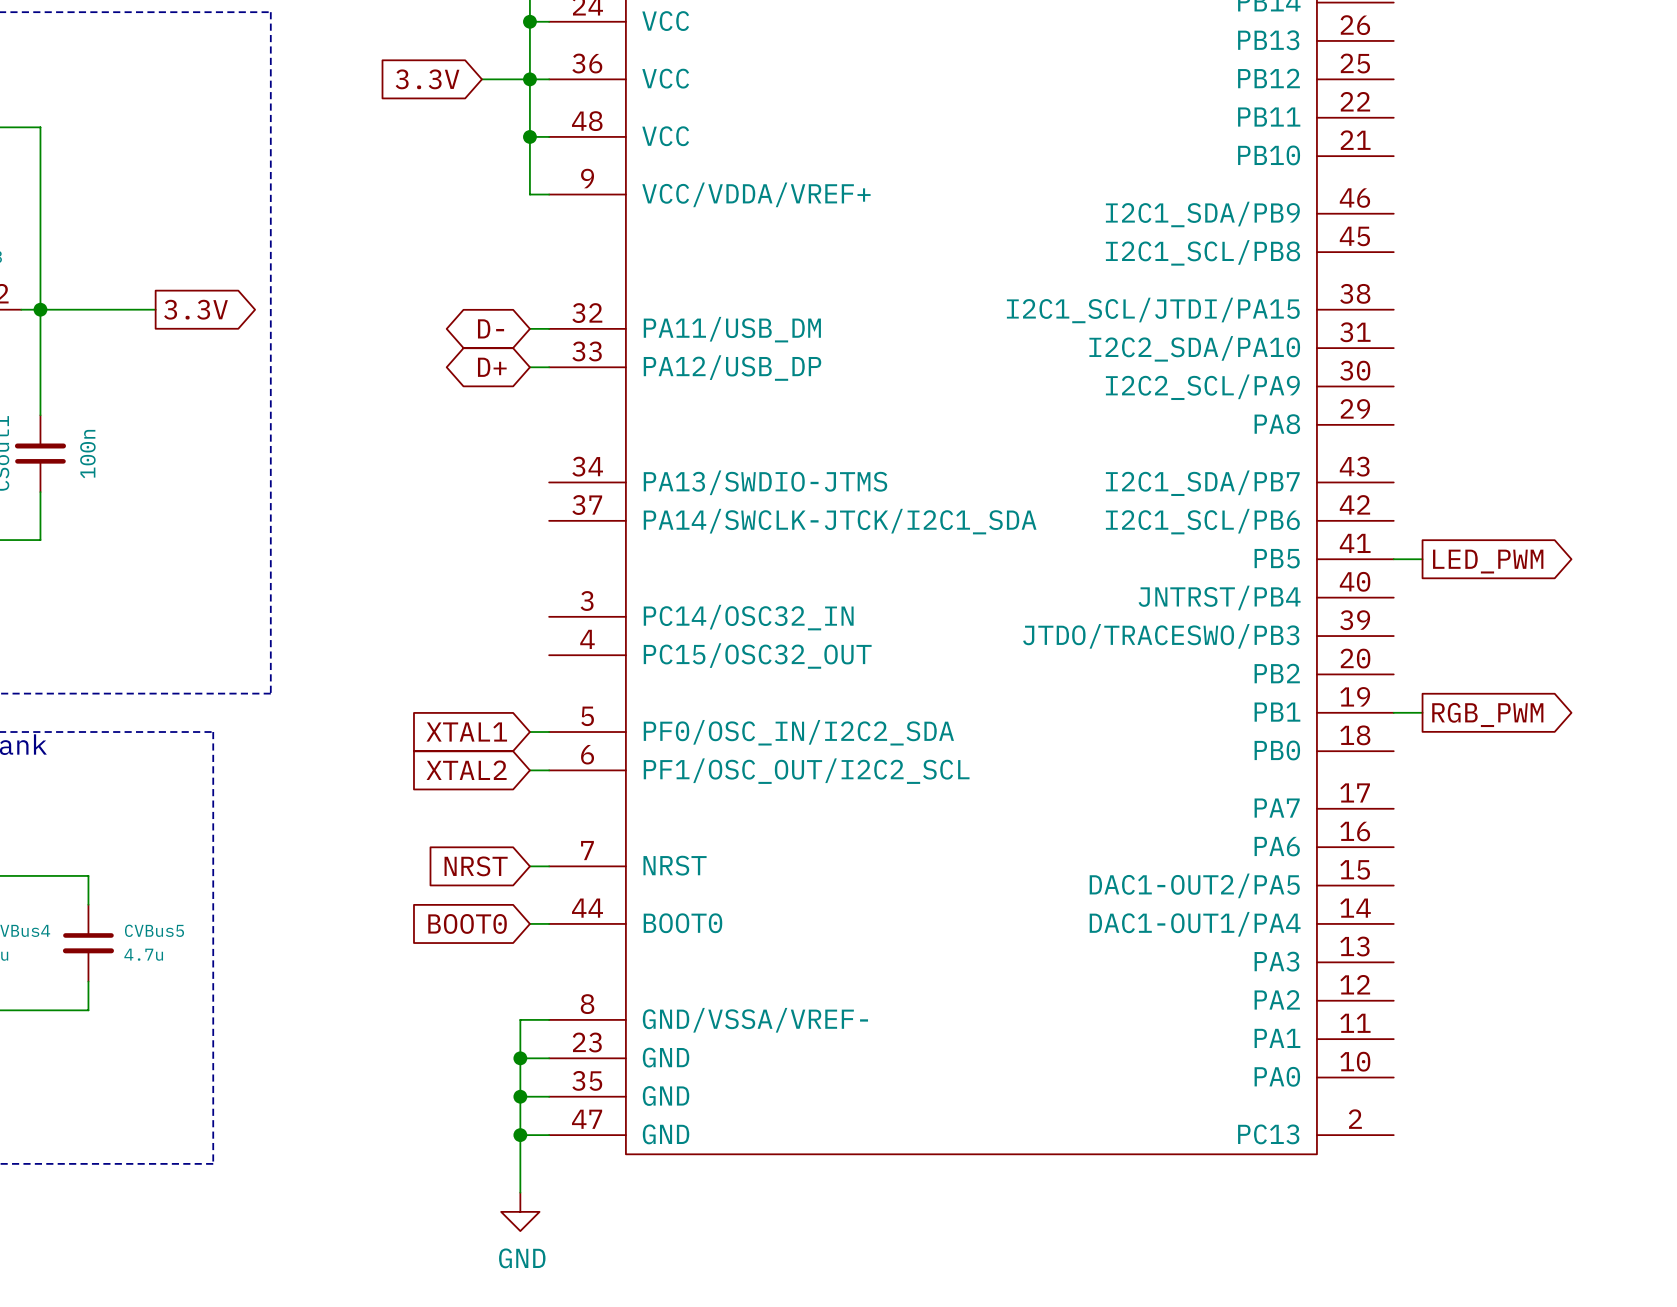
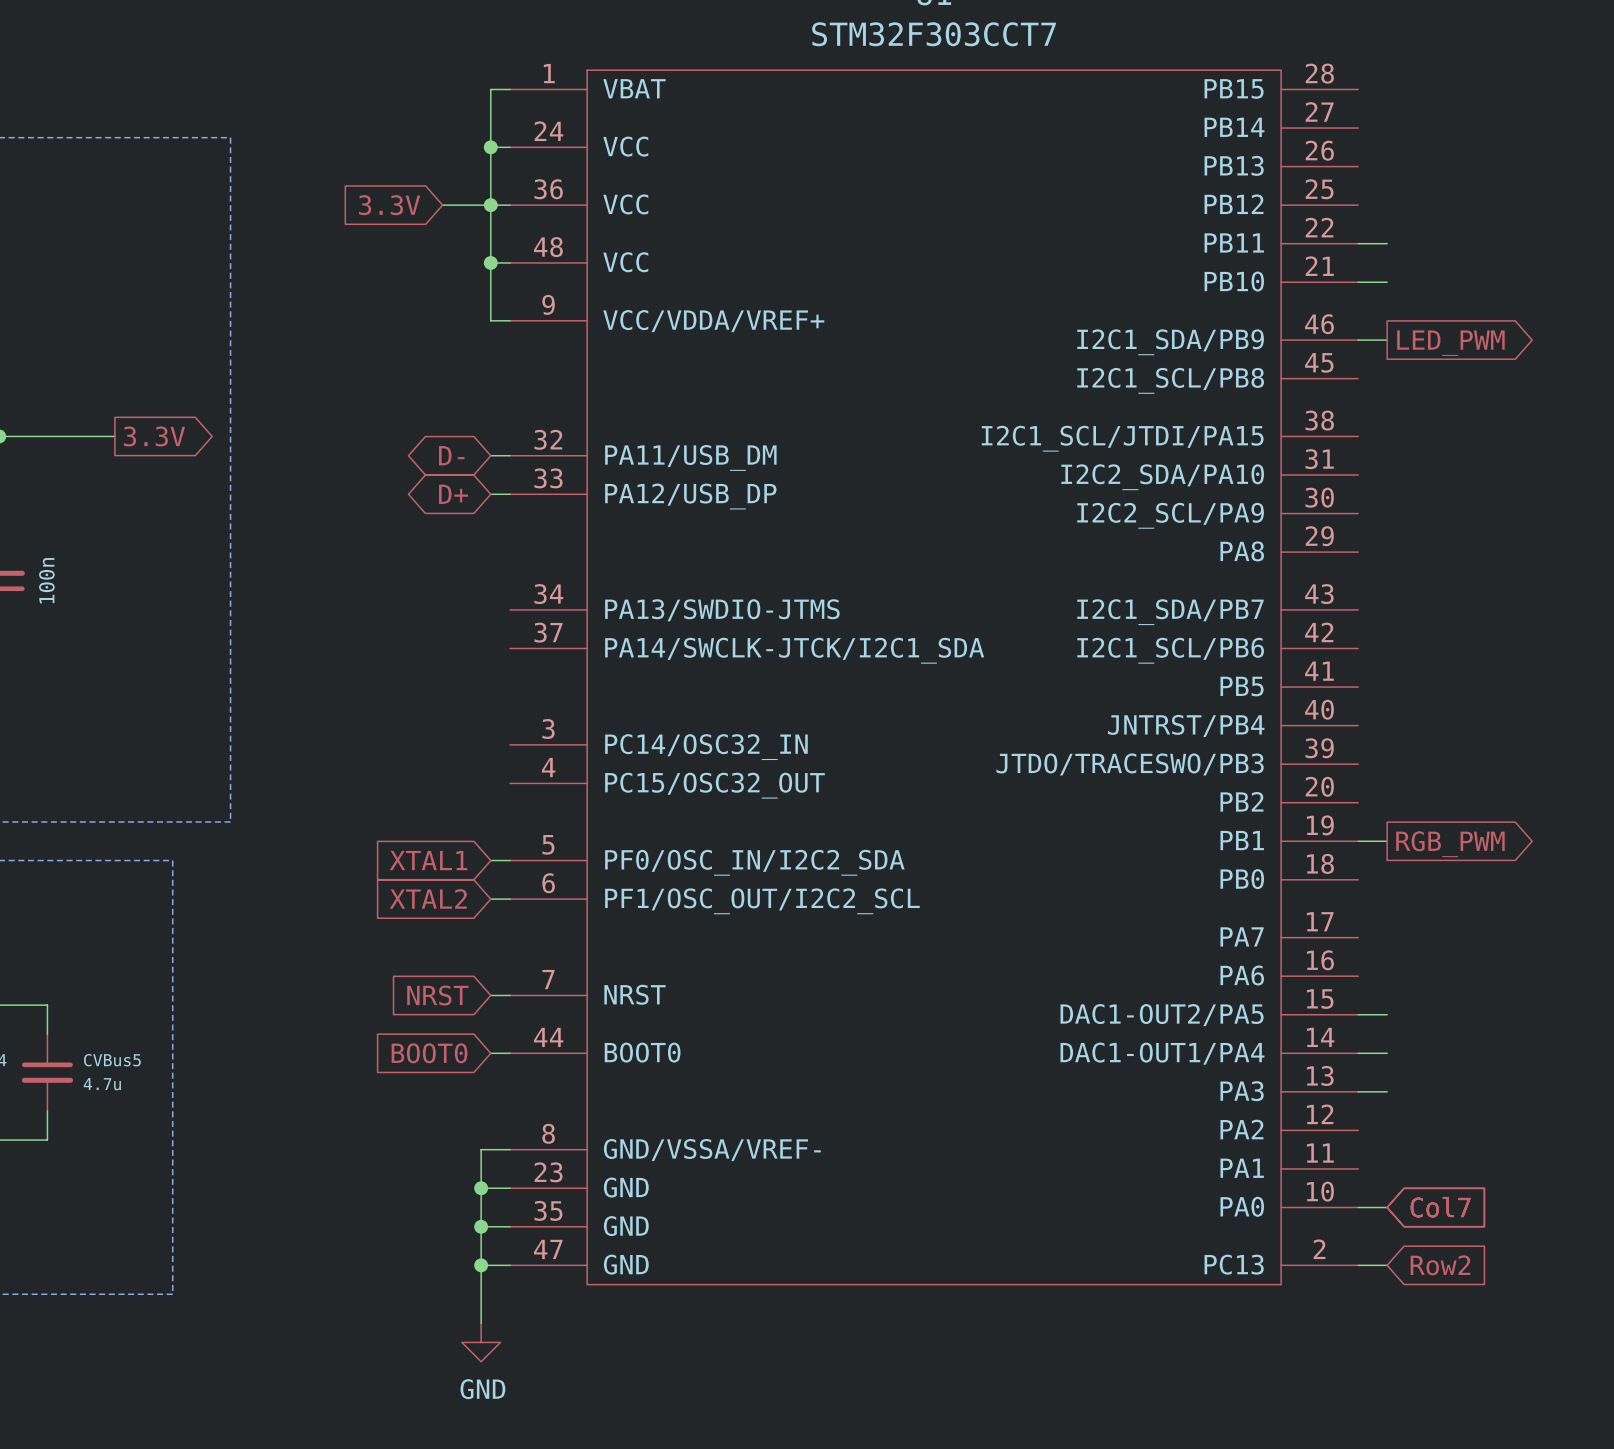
wire: none -> (1358, 243) (1387, 243)
wire: none -> (1358, 282) (1387, 282)
wire: none -> (1358, 340) (1387, 340)
wire: (1393, 559) (1422, 559) -> (1358, 1014) (1387, 1014)
global label position: LED_PWM (1488, 561) -> LED_PWM (1450, 343)
wire: none -> (1358, 1053) (1387, 1053)
wire: none -> (1358, 1091) (1387, 1091)
wire: none -> (1358, 1207) (1387, 1207)
global label: none -> Col7 (1440, 1207)
wire: none -> (1358, 1265) (1387, 1265)
global label: none -> Row2 (1440, 1265)

